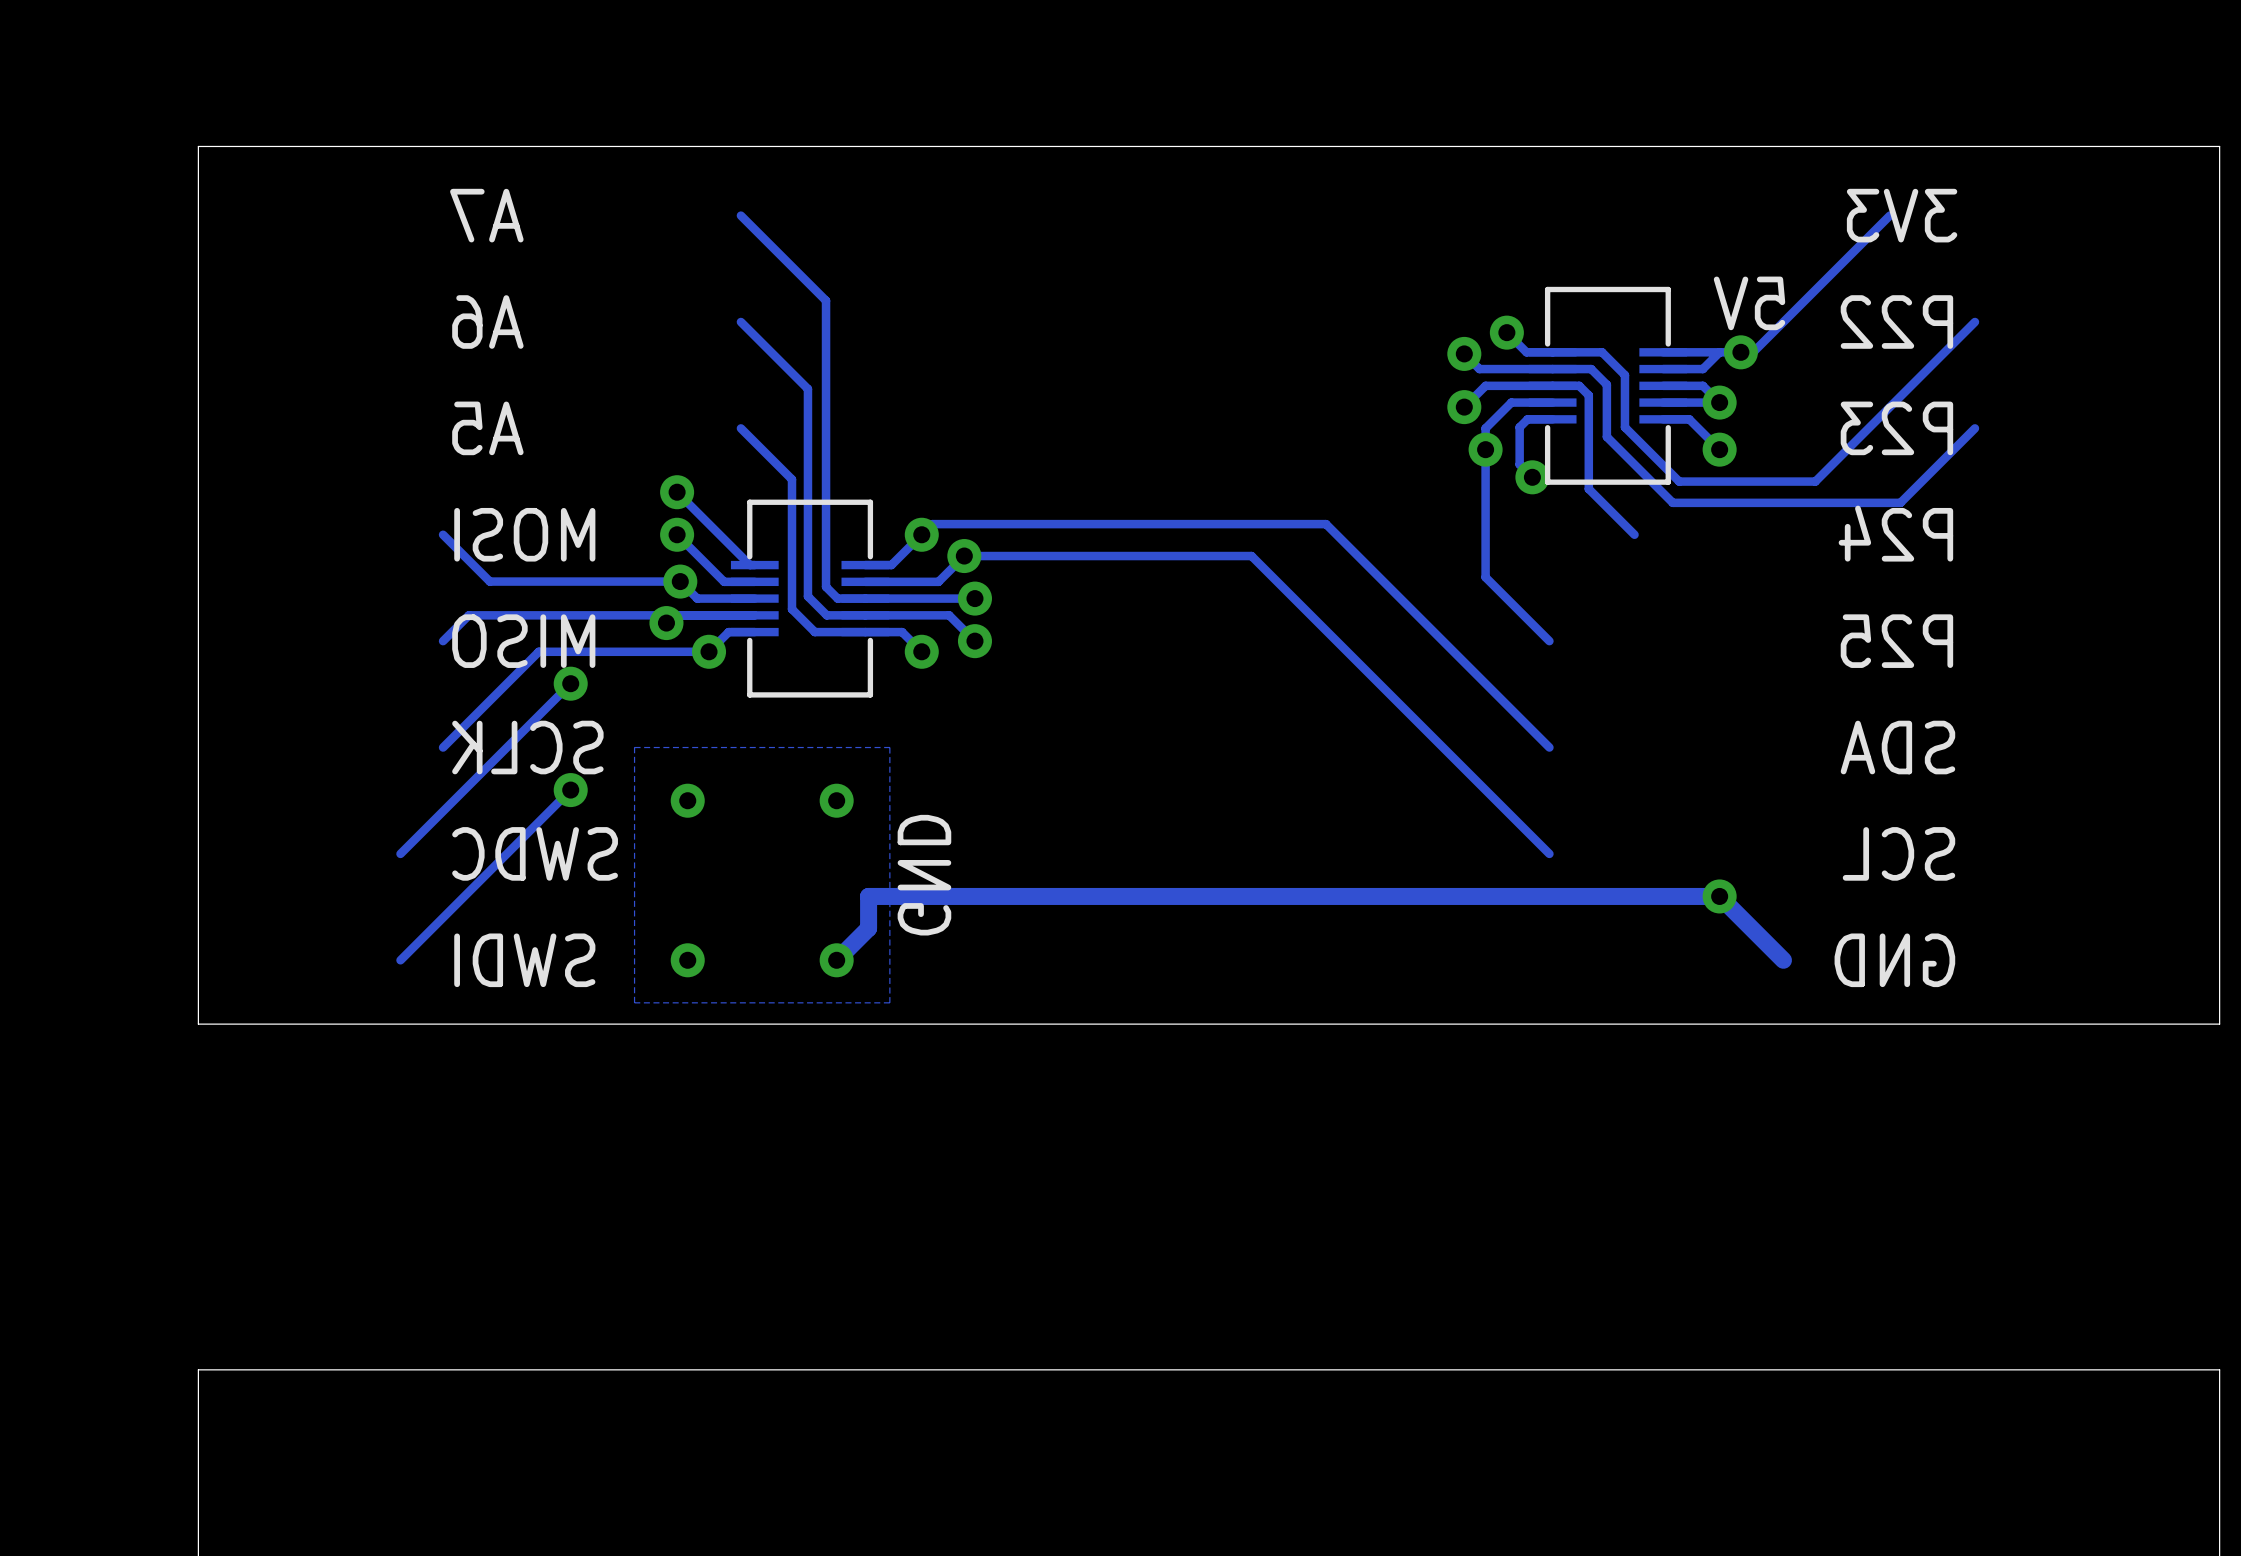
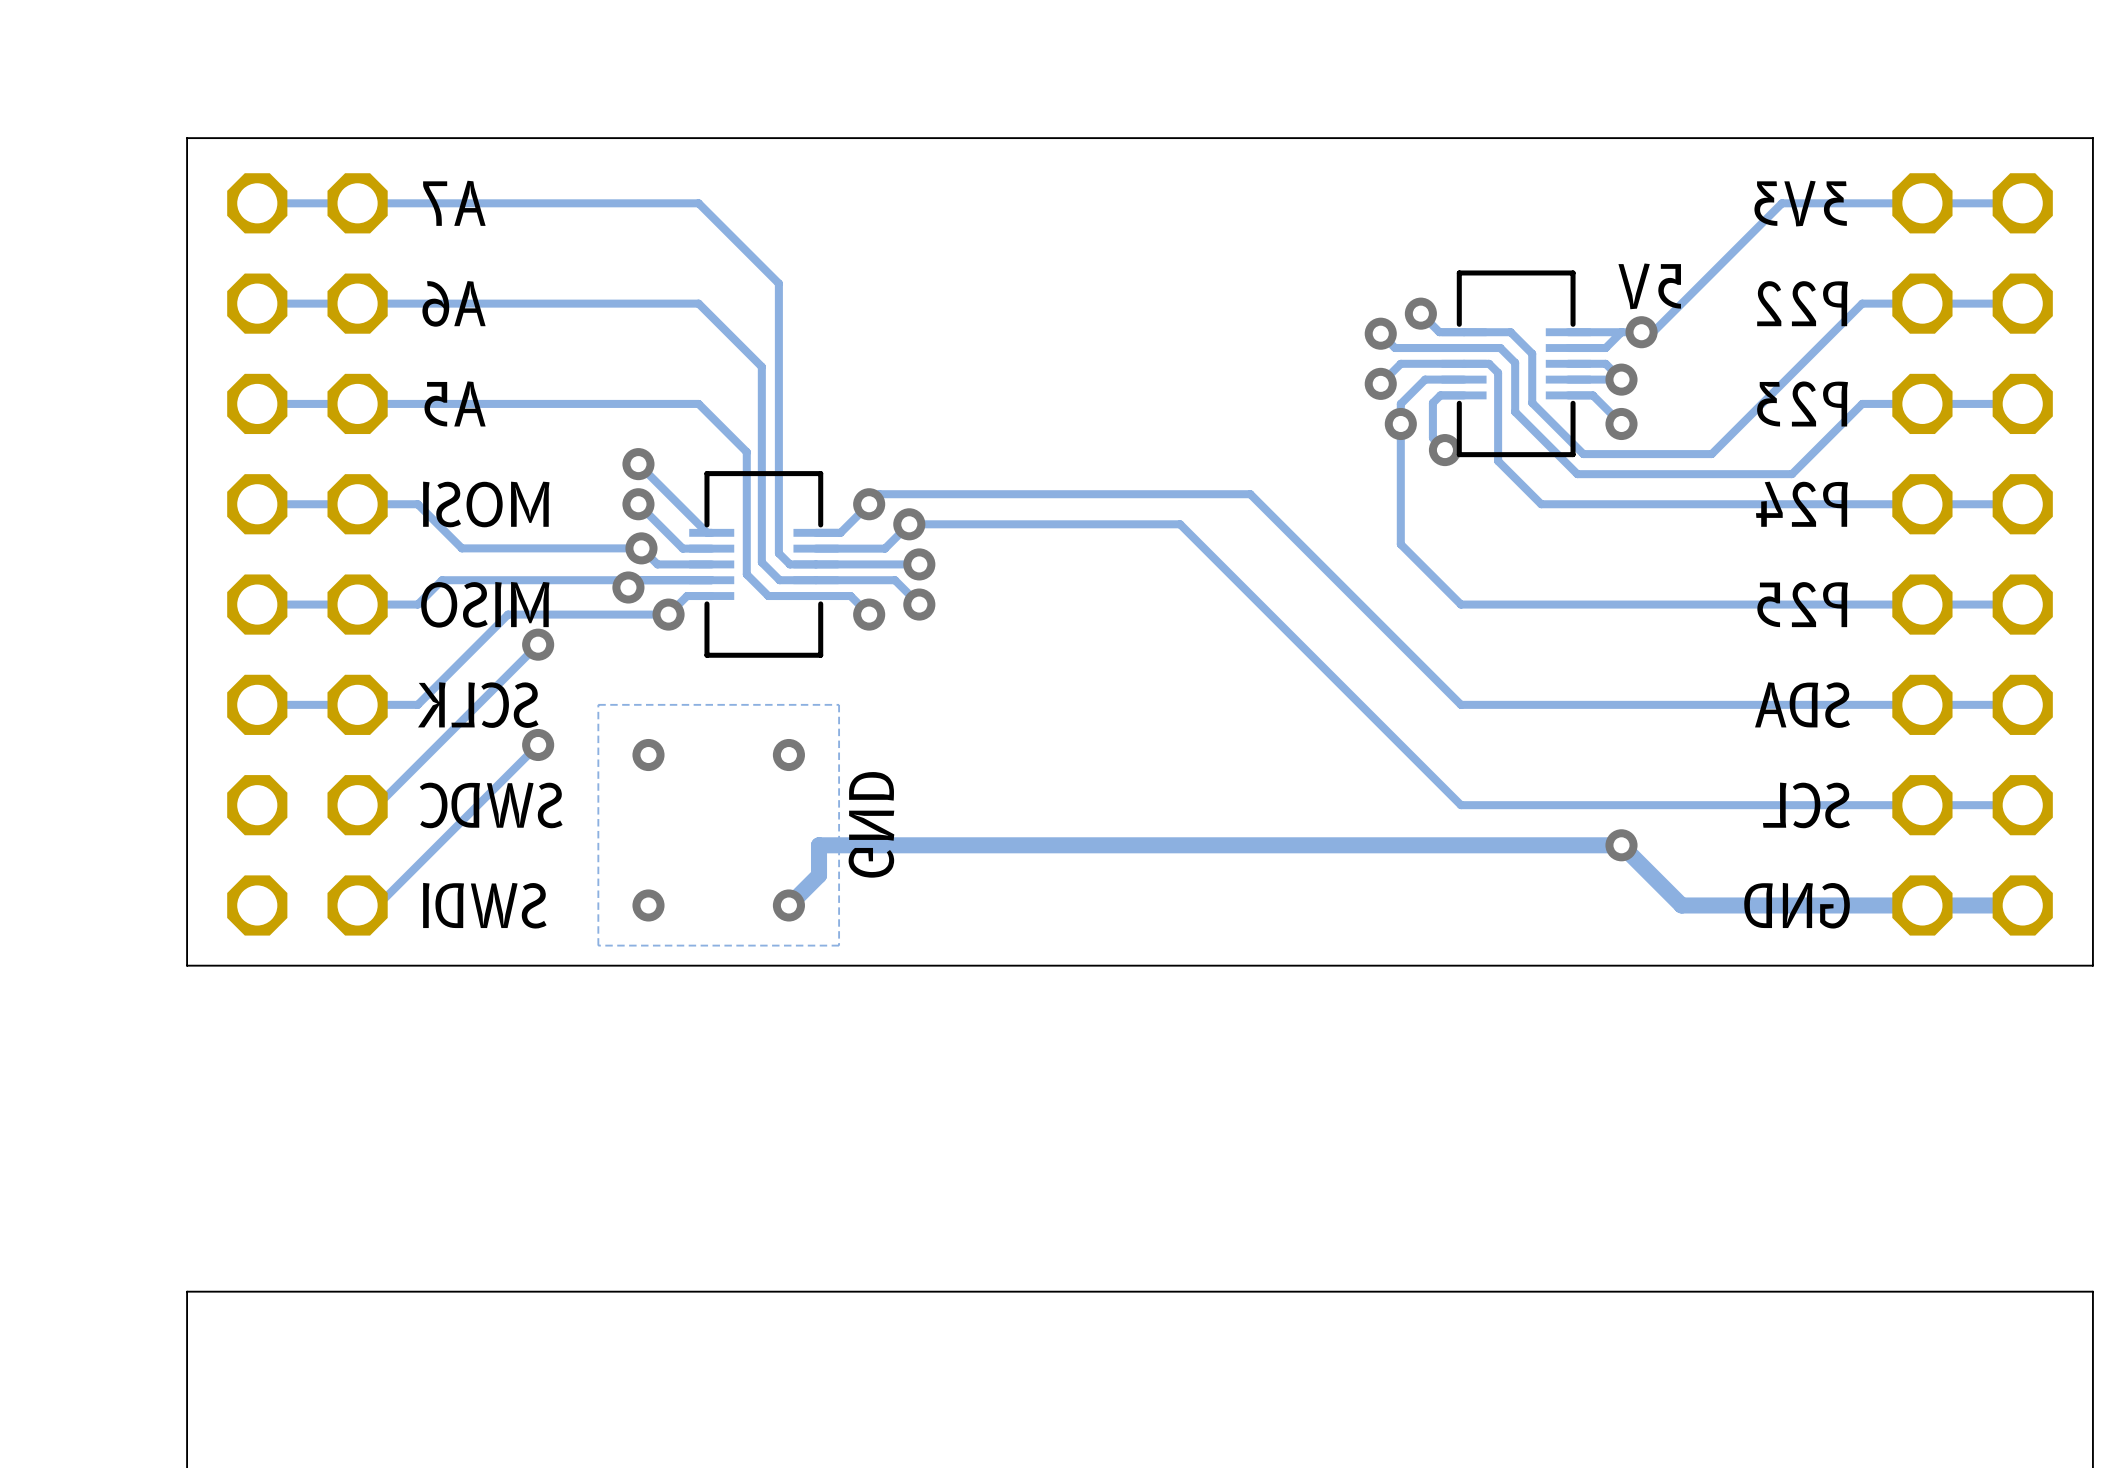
track: none -> (698, 203) (257, 203)
track: none -> (2022, 203) (1781, 203)
track: none -> (698, 303) (257, 303)
track: none -> (2022, 303) (1862, 303)
track: none -> (698, 403) (257, 403)
track: none -> (2022, 403) (1862, 403)
track: none -> (417, 504) (257, 504)
track: none -> (2022, 504) (1541, 504)
part: none -> (307, 554)
part: none -> (1972, 554)
track: none -> (417, 604) (257, 604)
track: none -> (2022, 604) (1461, 604)
track: none -> (417, 704) (257, 704)
track: none -> (2022, 704) (1461, 704)
track: none -> (2022, 805) (1461, 805)
track: none -> (2022, 905) (1681, 905)

